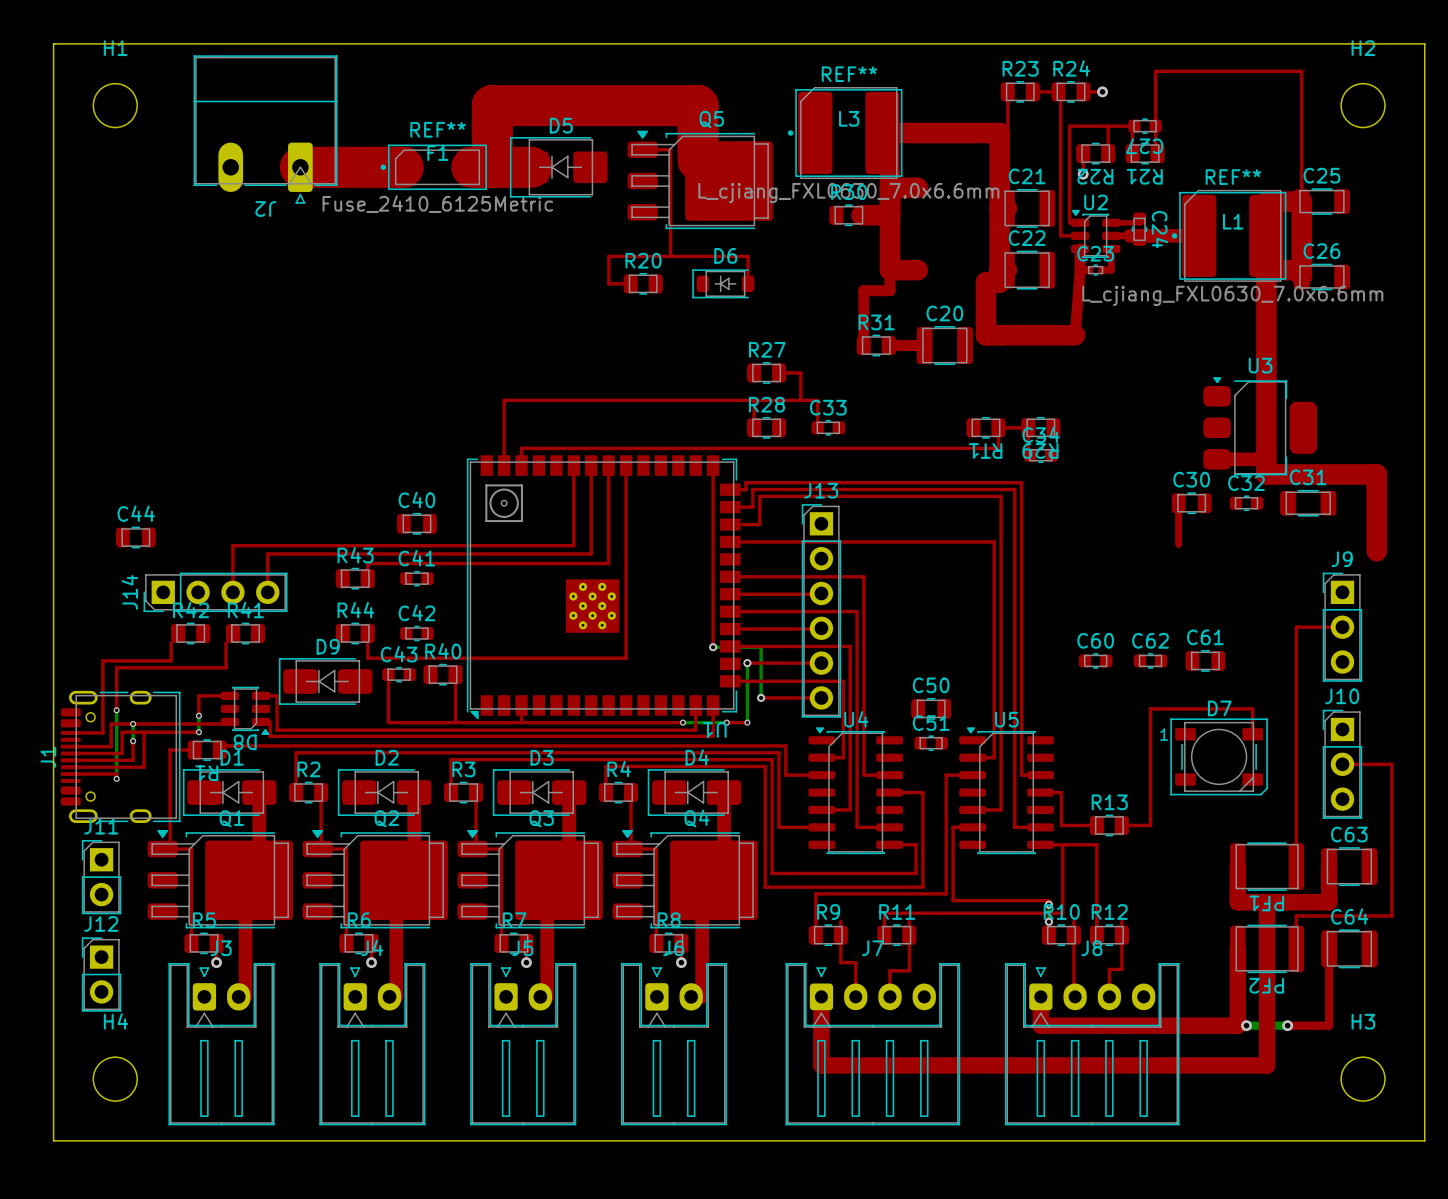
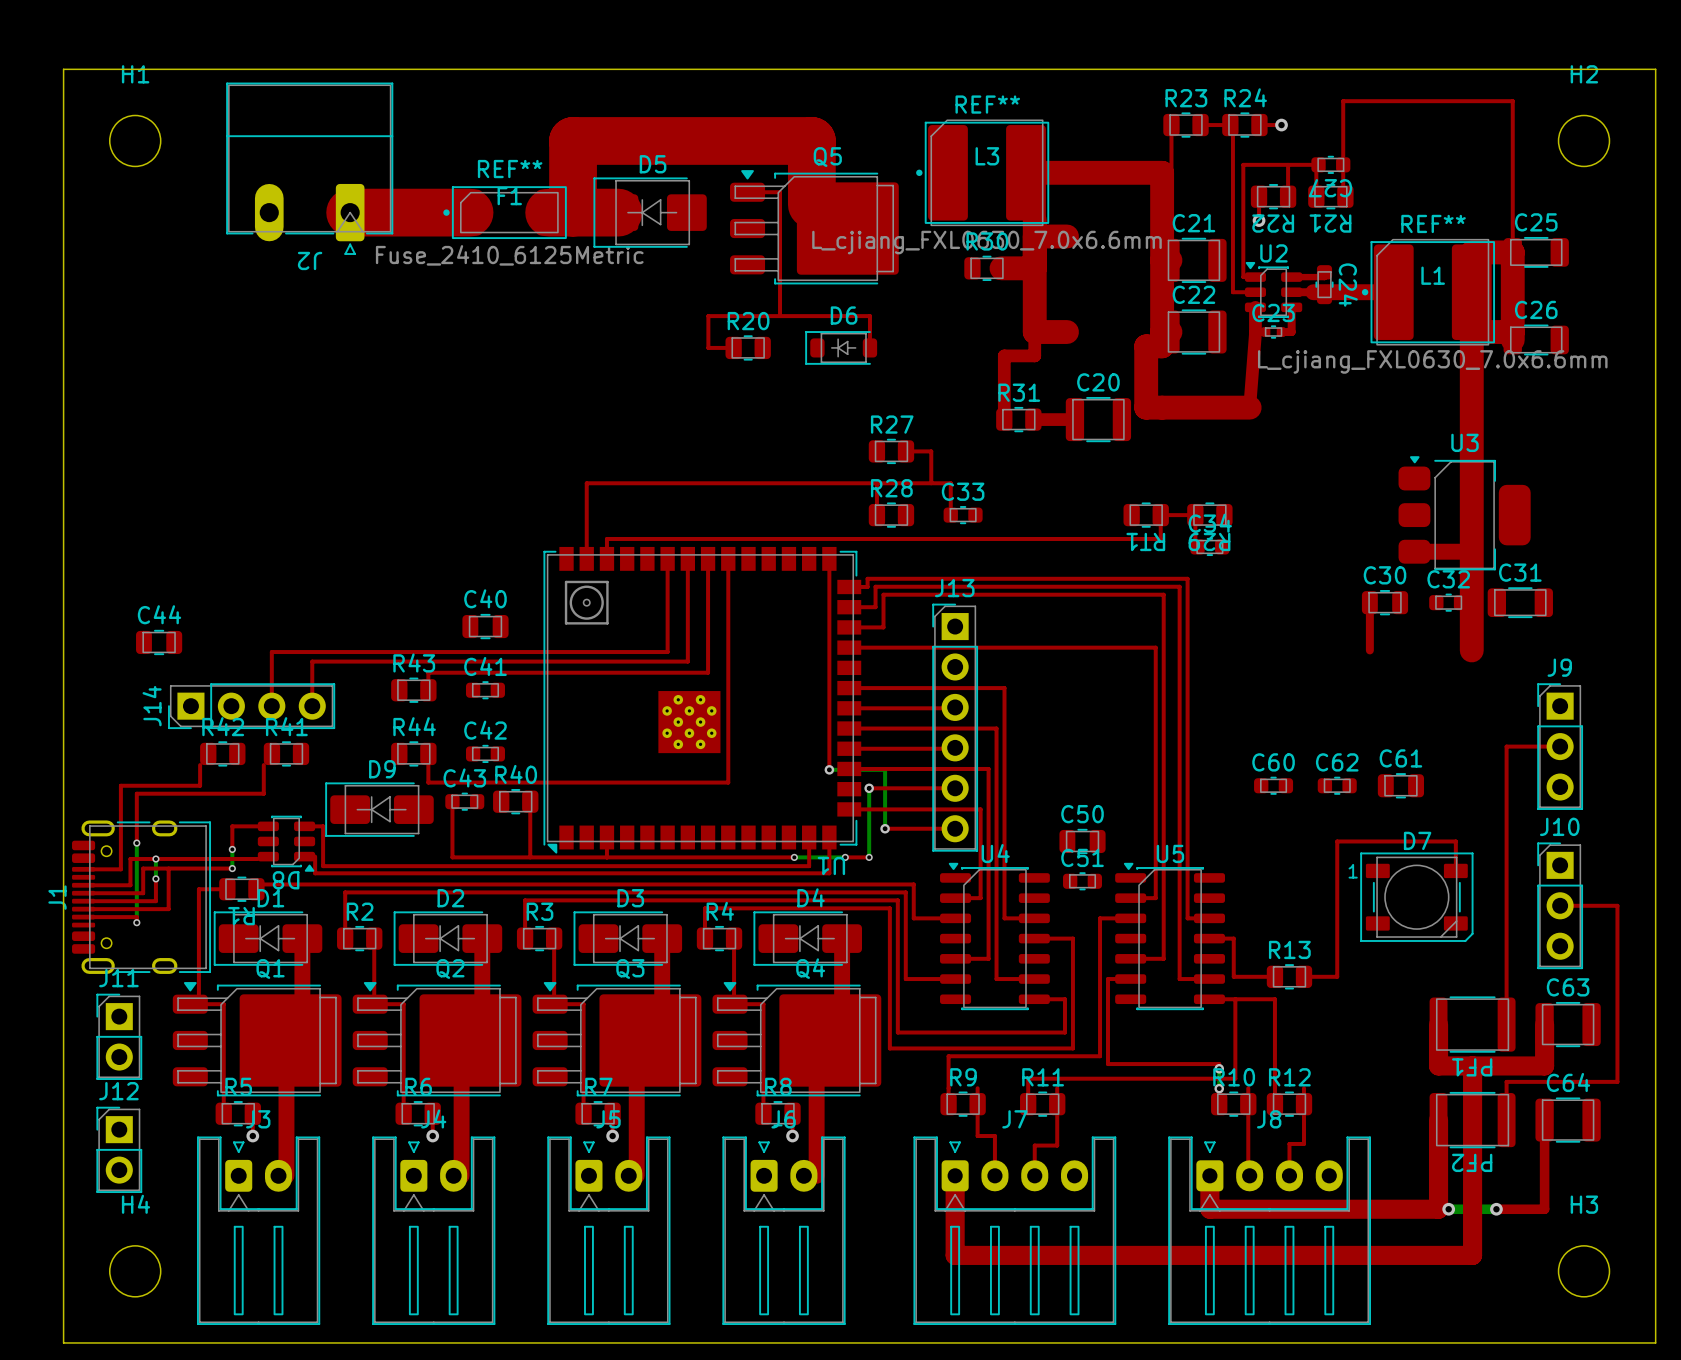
top track: (1266, 474) (1376, 474) (1376, 551) -> (1471, 569) (1471, 650)

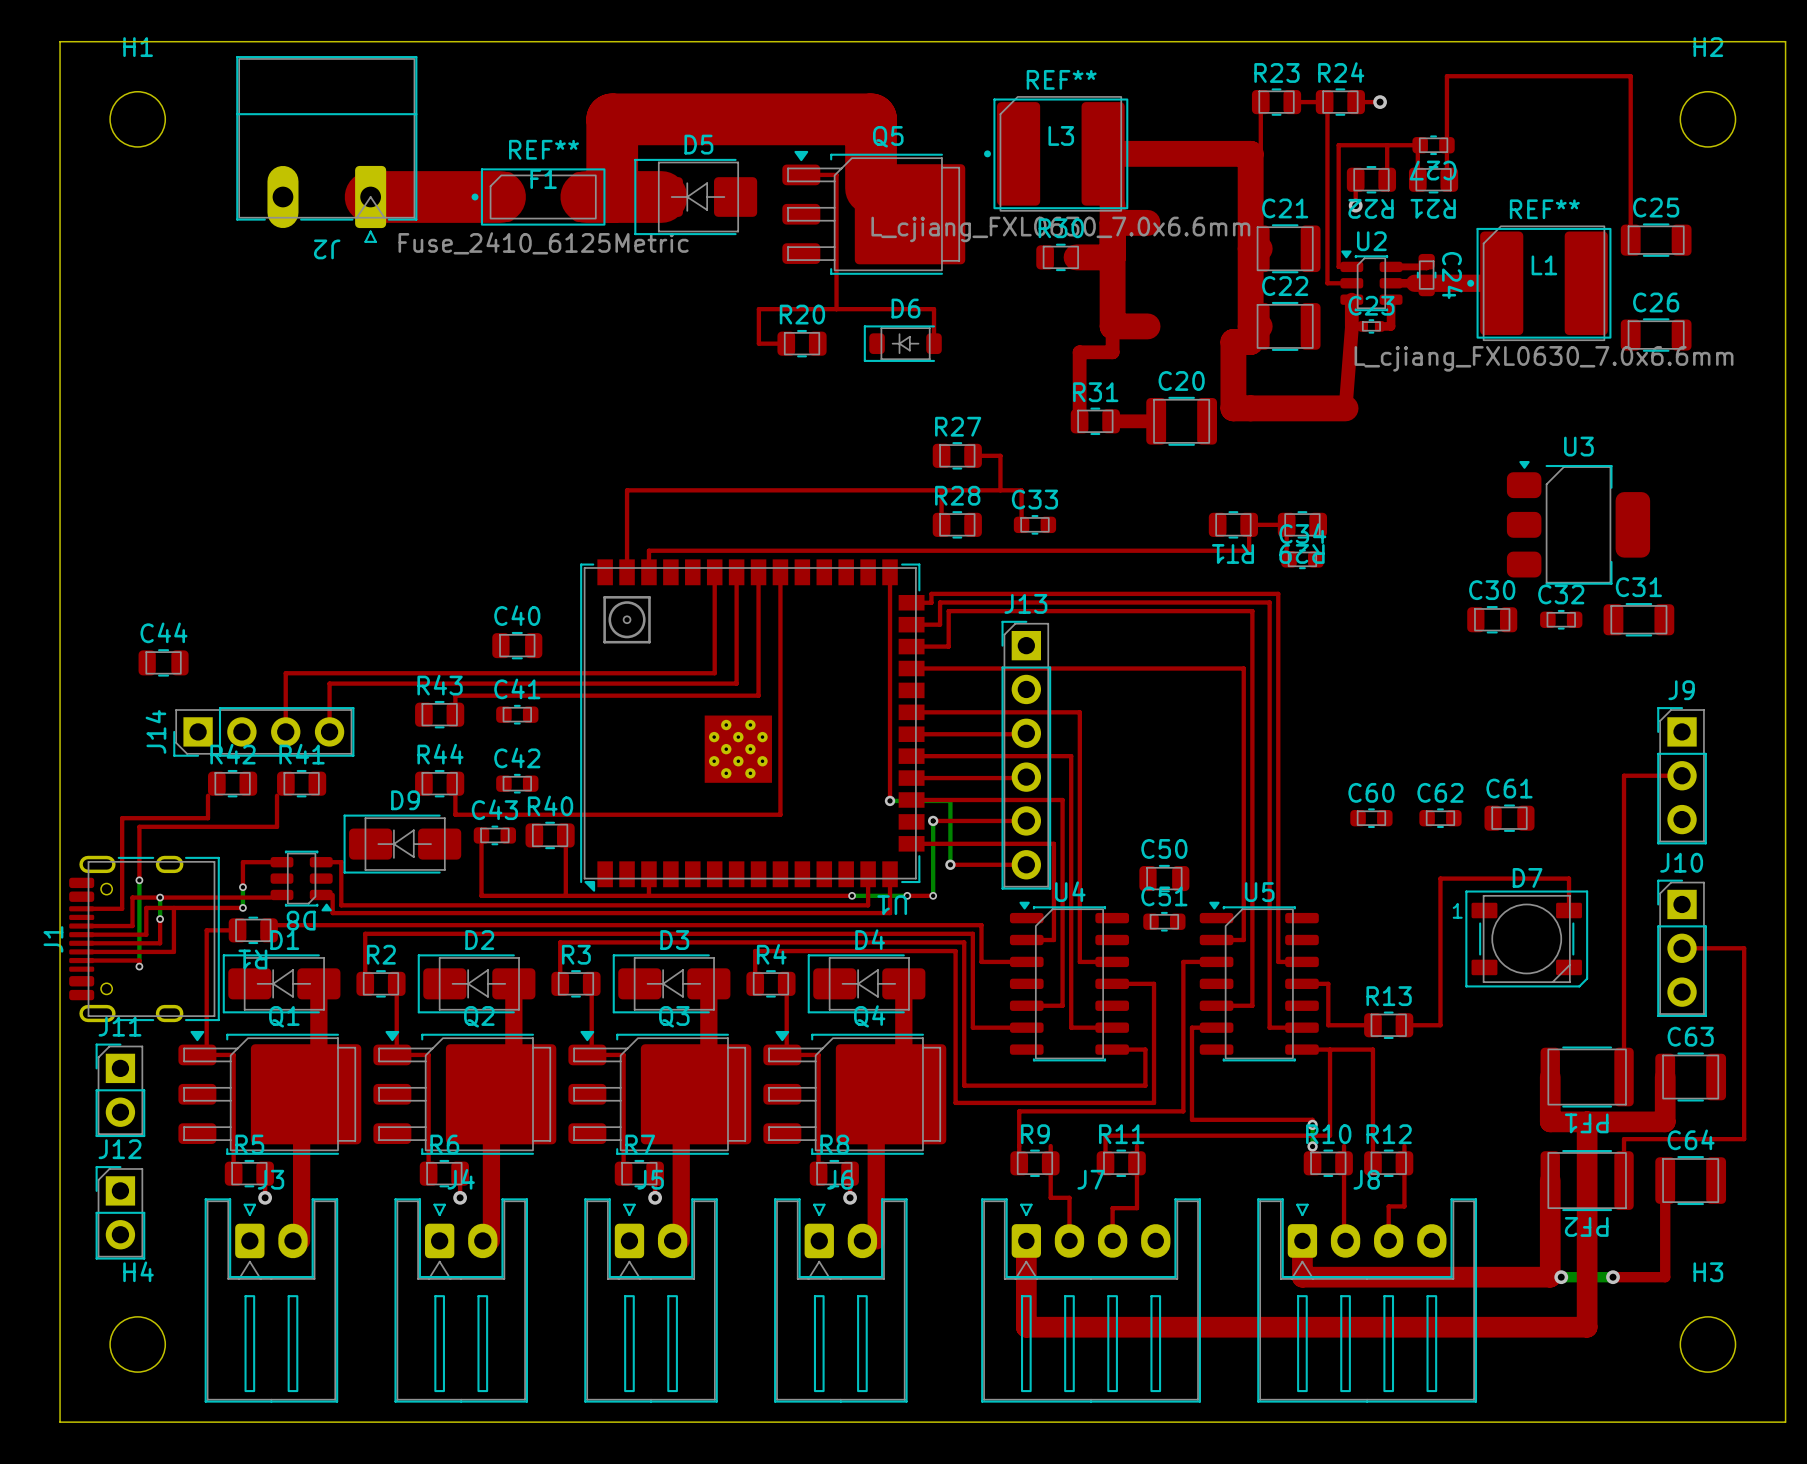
top track: (1471, 252) (1512, 252) (1512, 339) -> none
top track: (1512, 332) (1471, 332) (1471, 650) -> none
top track: (1430, 551) (1471, 551) -> none
top track: (1369, 613) (1369, 650) -> none

